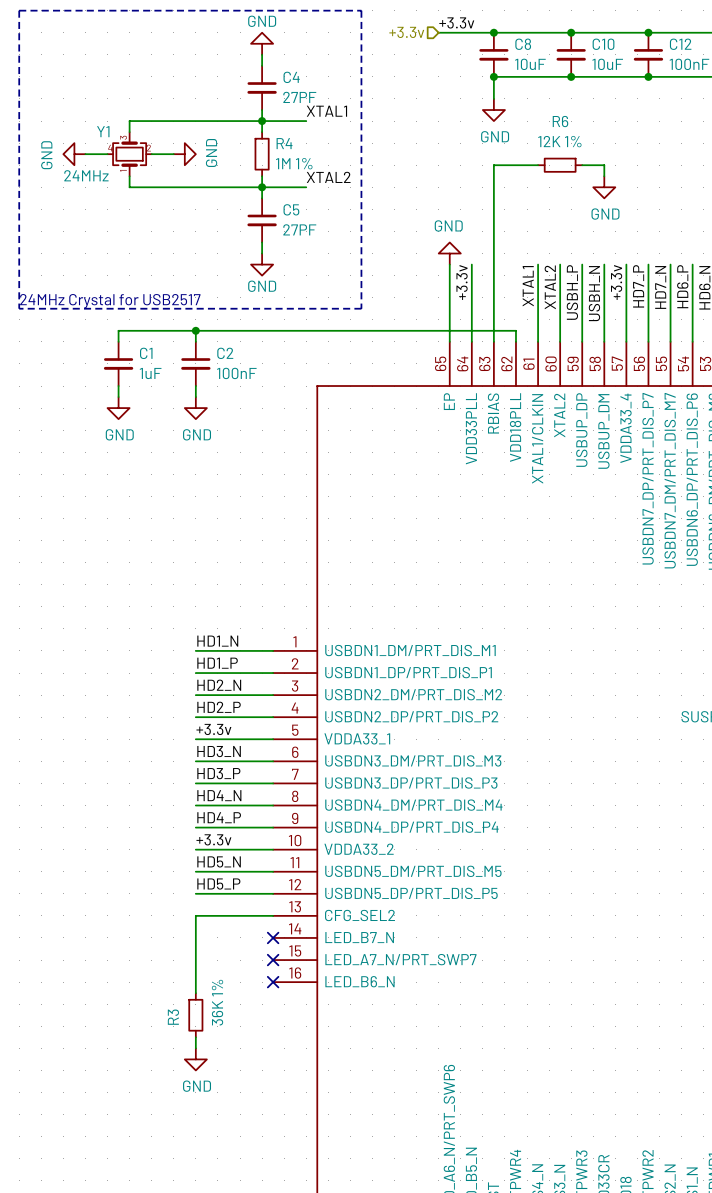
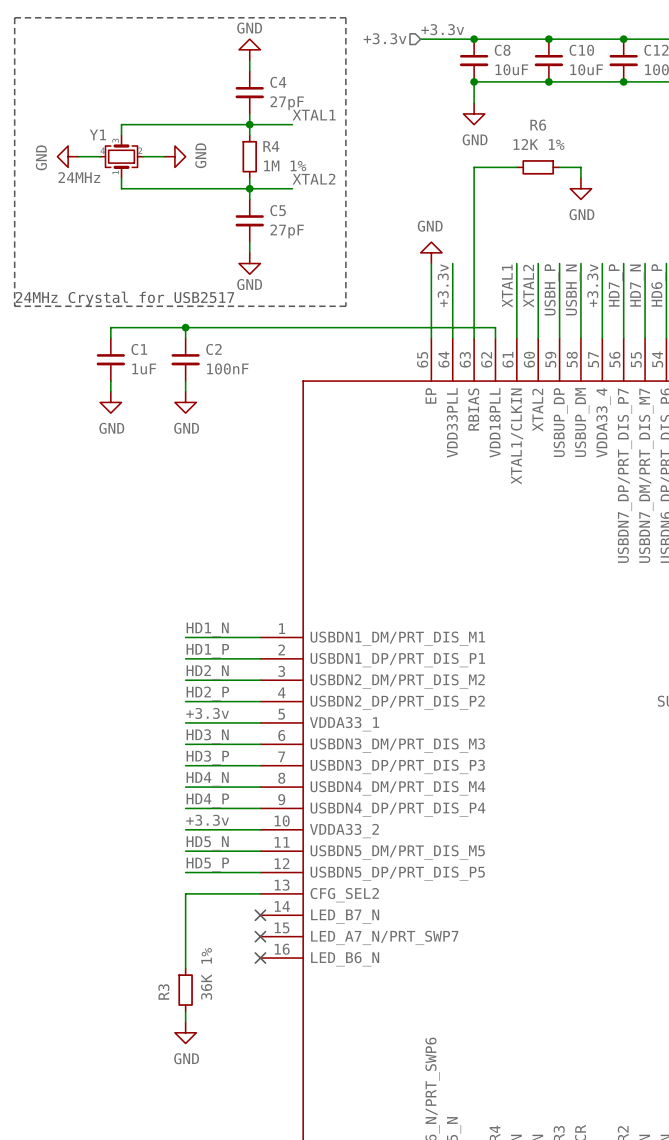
C4 value: 27PF (299, 97) -> 27pF (287, 103)
C5 value: 27PF (299, 229) -> 27pF (287, 231)

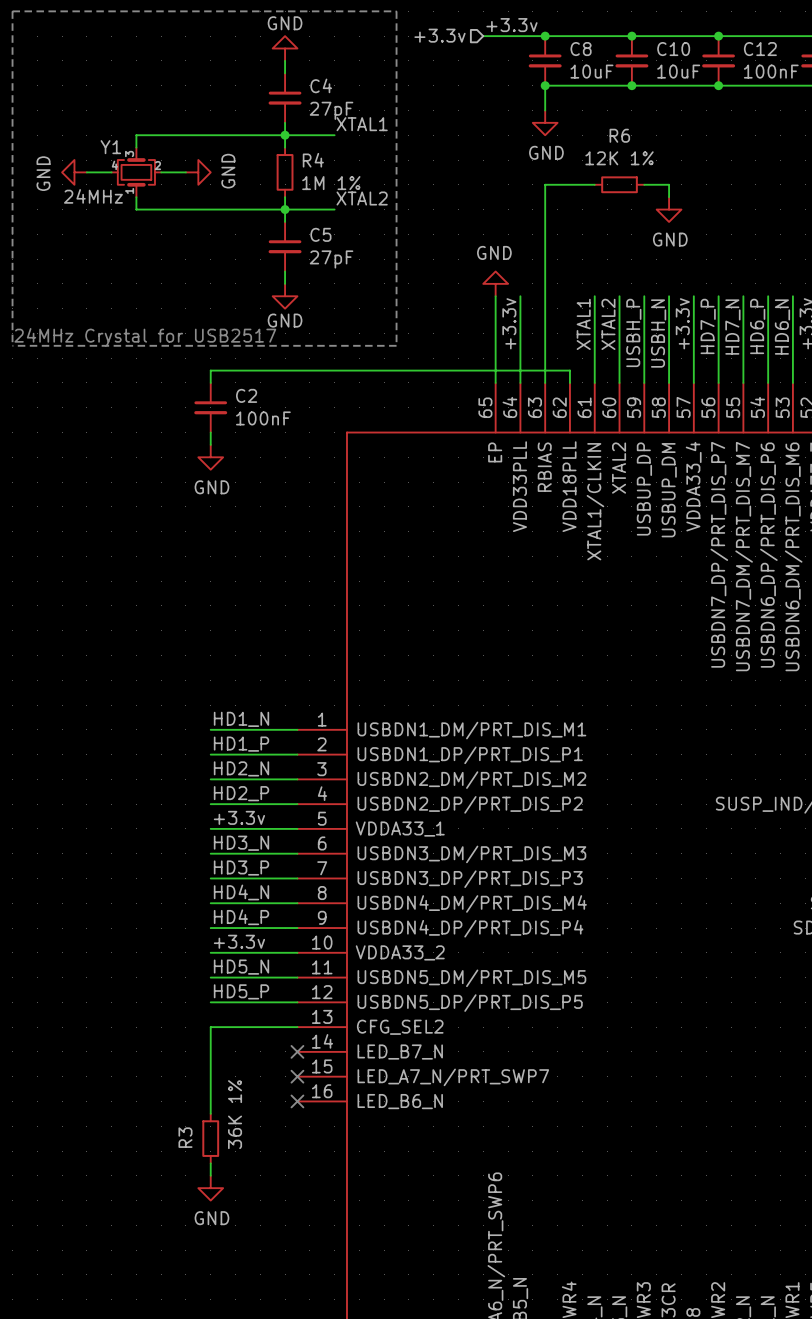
wire: (185, 327) (110, 327) (110, 338) -> none
junction: (185, 327) -> none
C1: 1uF (110, 359) -> none
wire: (110, 381) (110, 391) -> none
power symbol: GND (110, 402) -> none

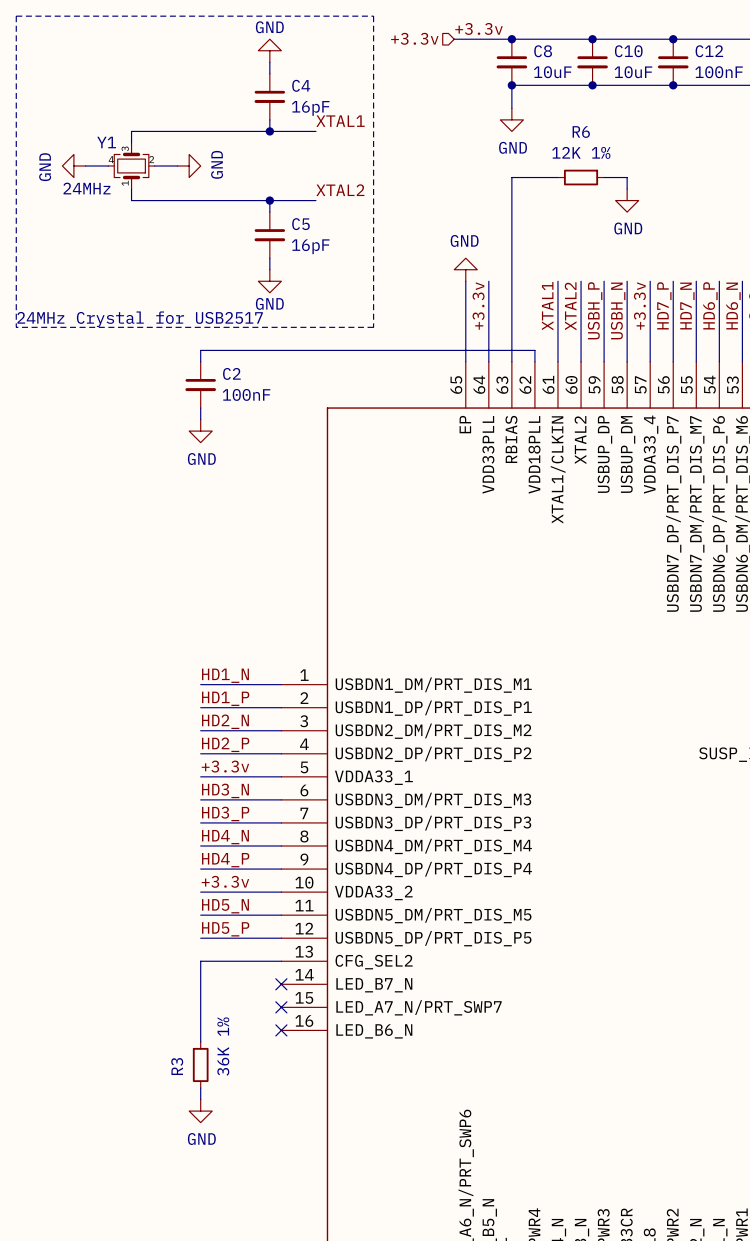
C4 value: 27pF (331, 110) -> 16pF (310, 108)
wire: (285, 135) (285, 147) -> none
R4: 1M 1% (285, 172) -> none
wire: (285, 197) (285, 209) -> none
C5 value: 27pF (331, 259) -> 16pF (310, 246)

